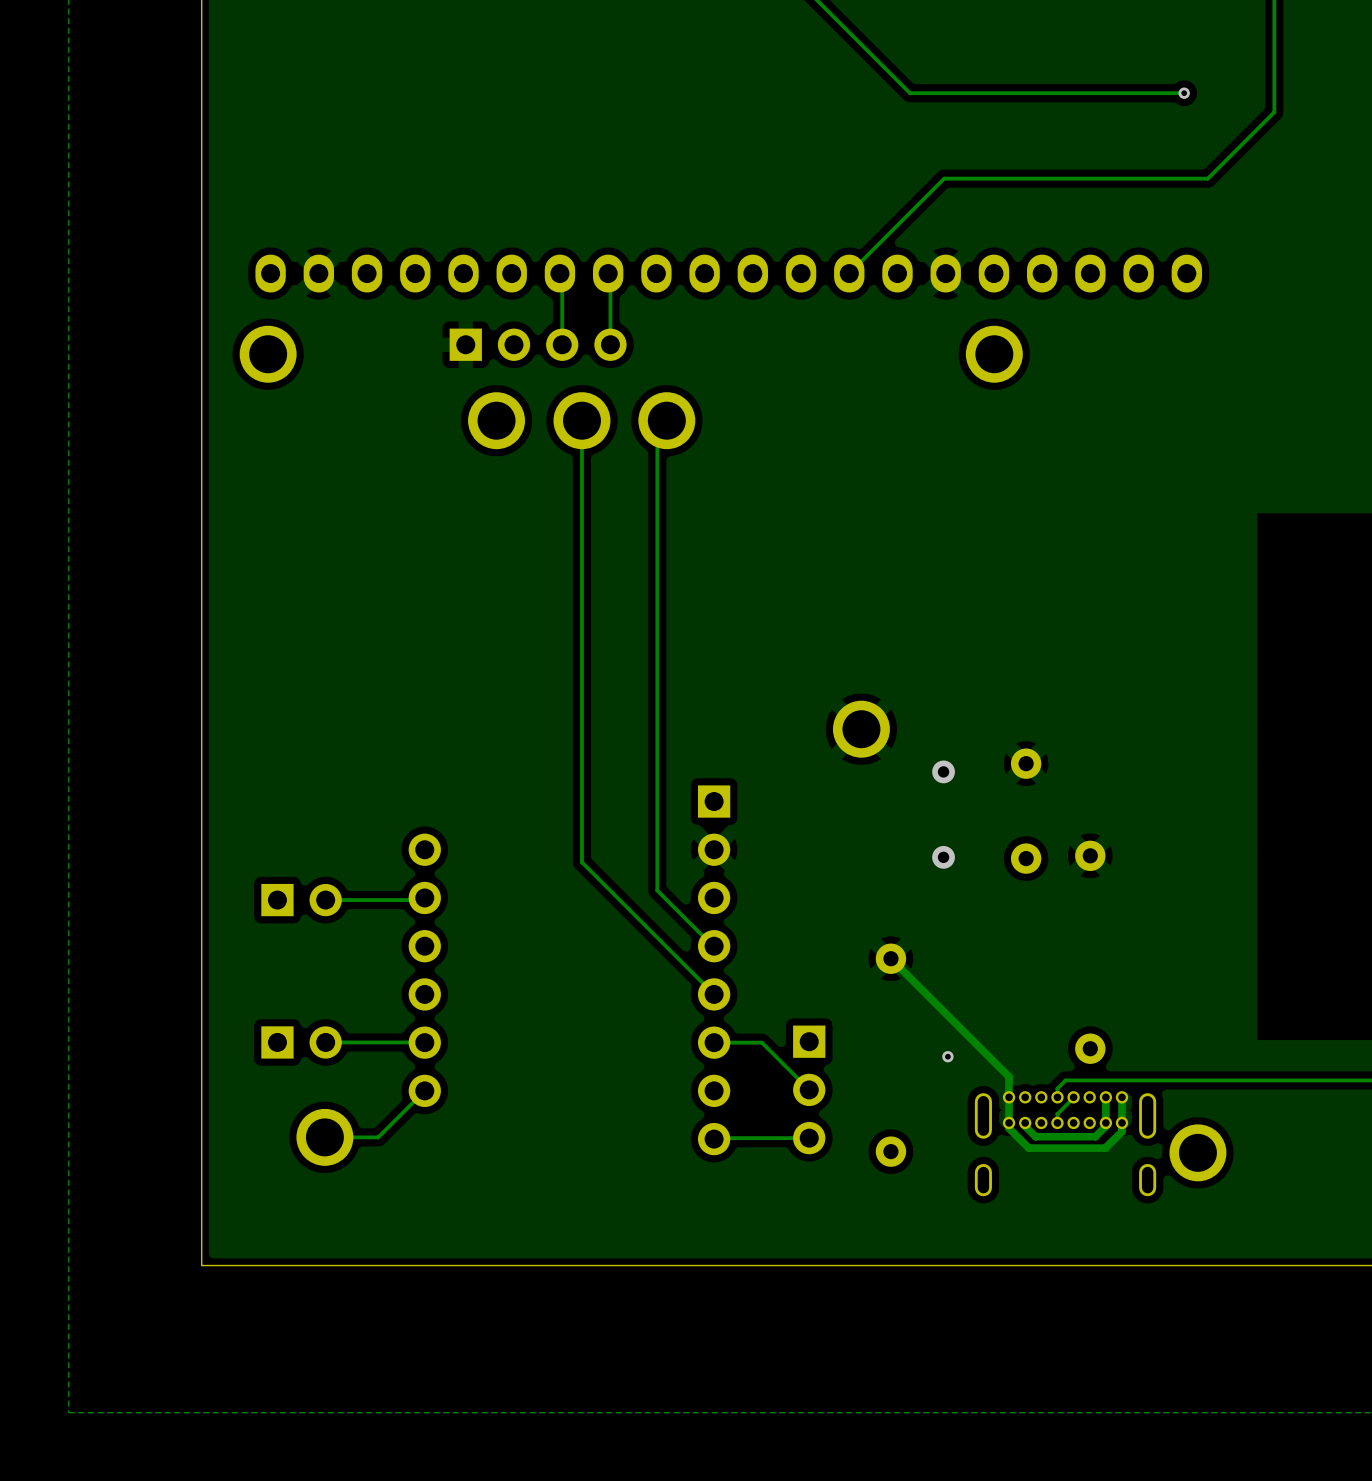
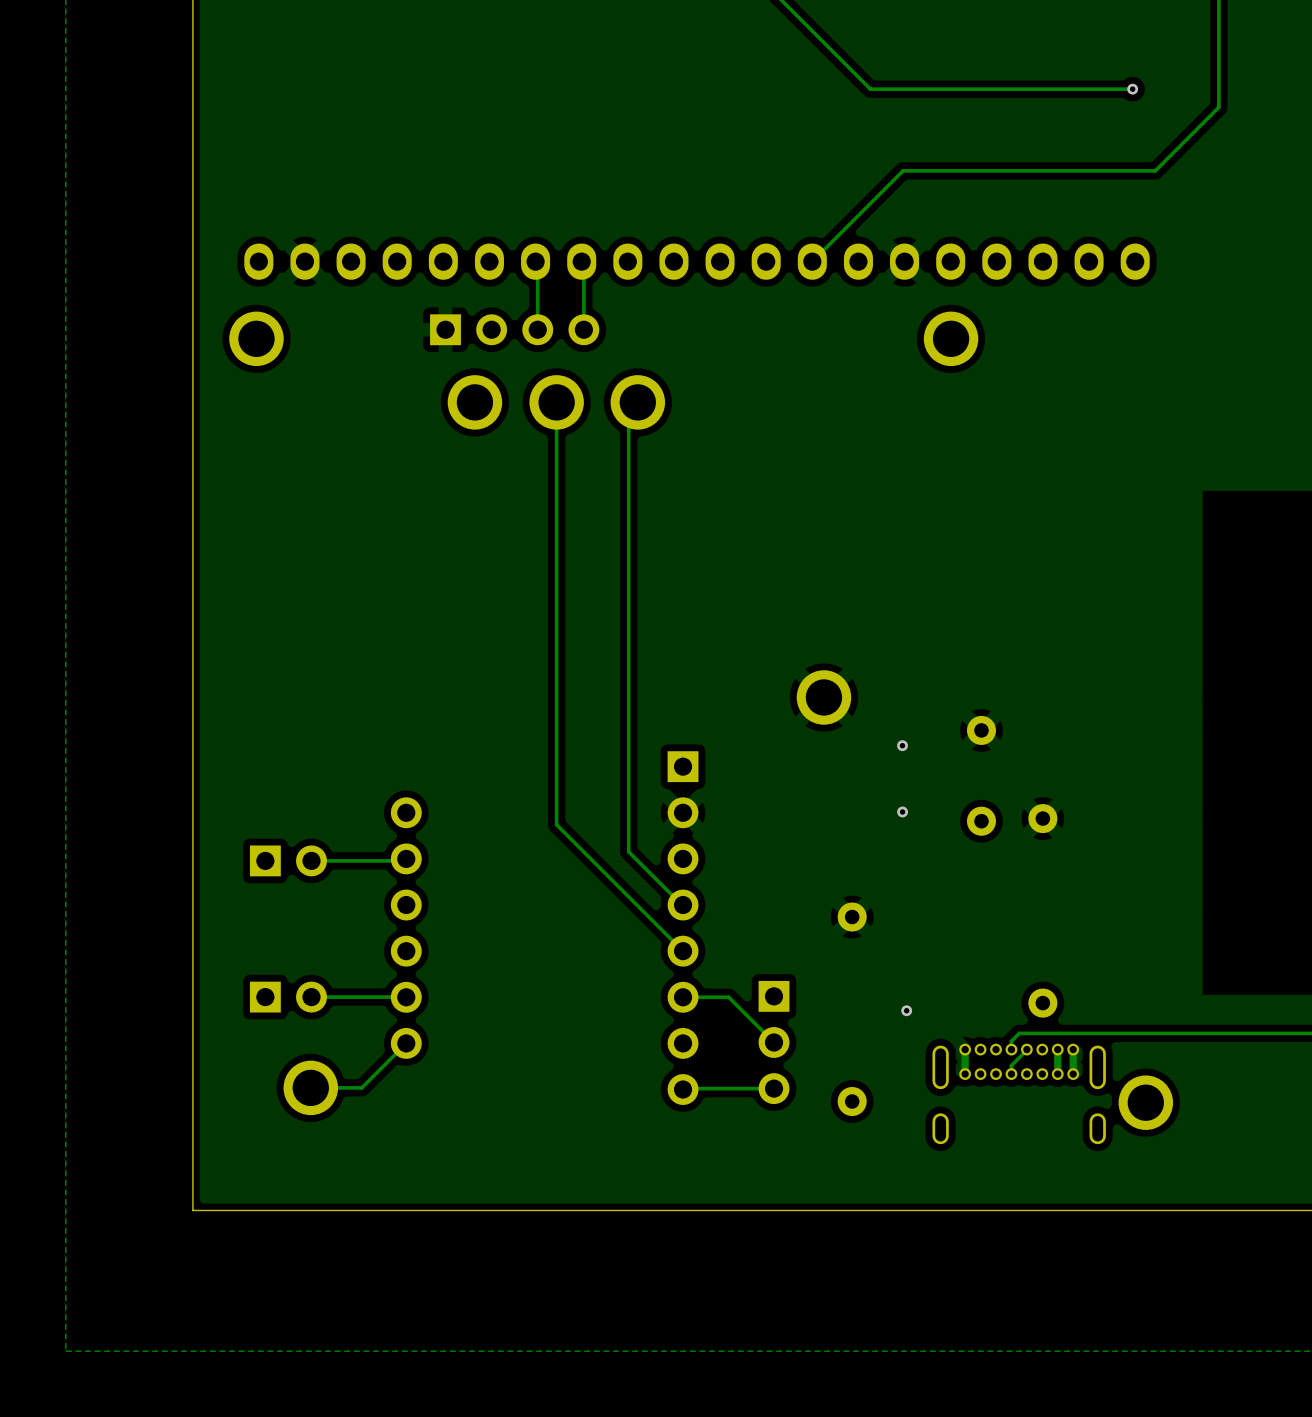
via size: [932, 760, 955, 784] -> [897, 740, 908, 752]
via size: [932, 845, 955, 869] -> [897, 806, 909, 818]
track: (890, 958) (1009, 1076) (1009, 1097) -> none
track: (1105, 1122) (1105, 1126) (1095, 1136) (1035, 1136) (1025, 1126) (1025, 1122) -> none
track: (1122, 1122) (1122, 1131) (1105, 1148) (1028, 1148) (1009, 1128) (1009, 1122) -> none

